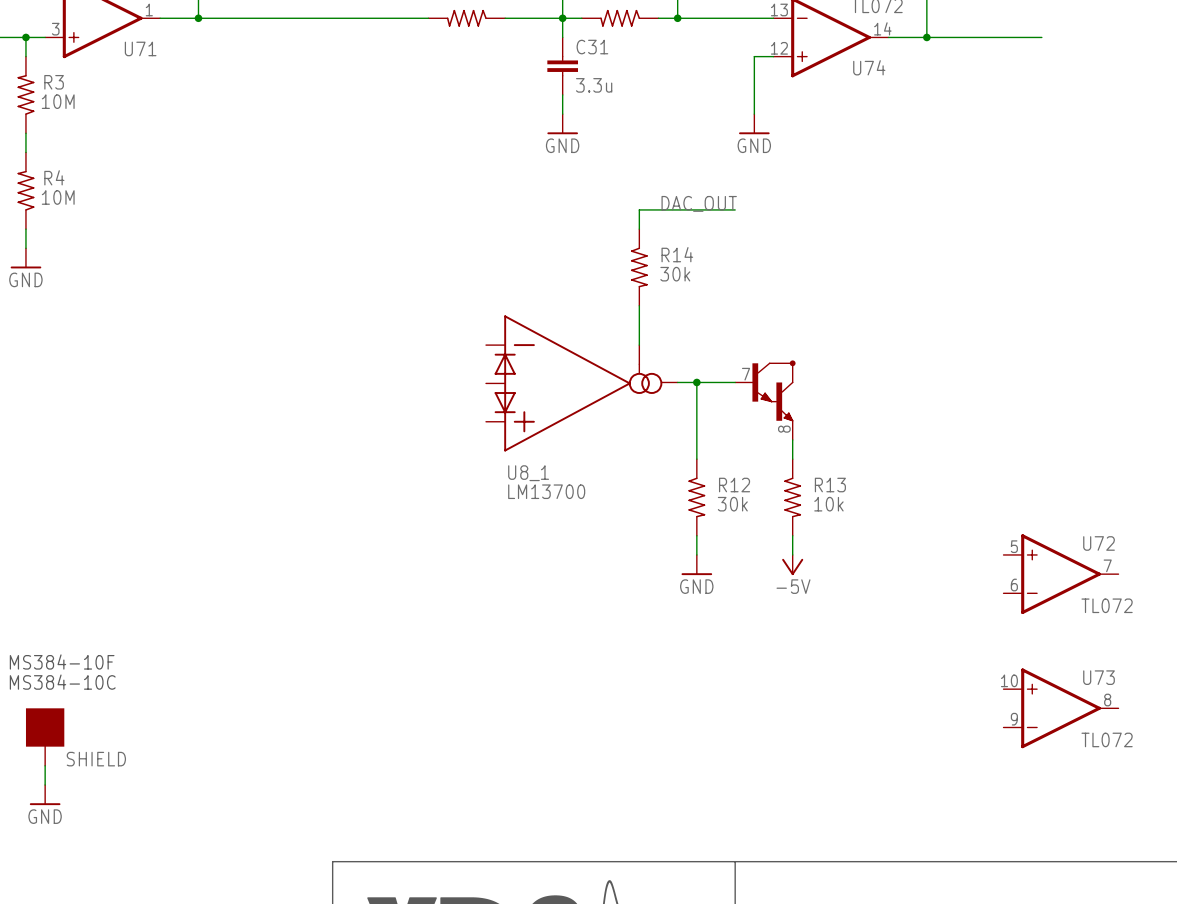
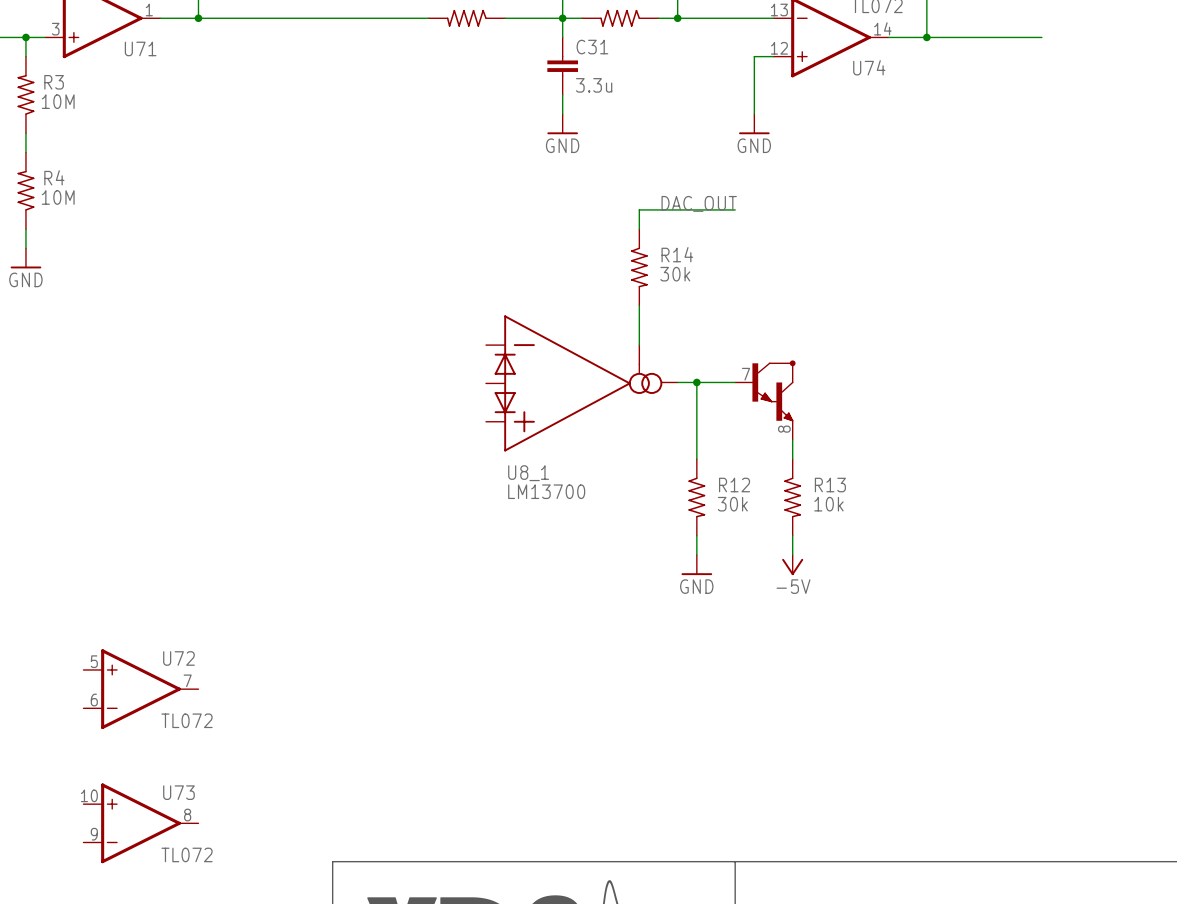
U72 position: (1061, 574) -> (140, 689)
text: MS384-10F (62, 662) -> none
text: MS384-10C (62, 682) -> none
U73 position: (1061, 708) -> (140, 823)
SHIELD: (45, 737) -> none
wire: (45, 765) (45, 784) -> none
power symbol: GND (45, 795) -> none

